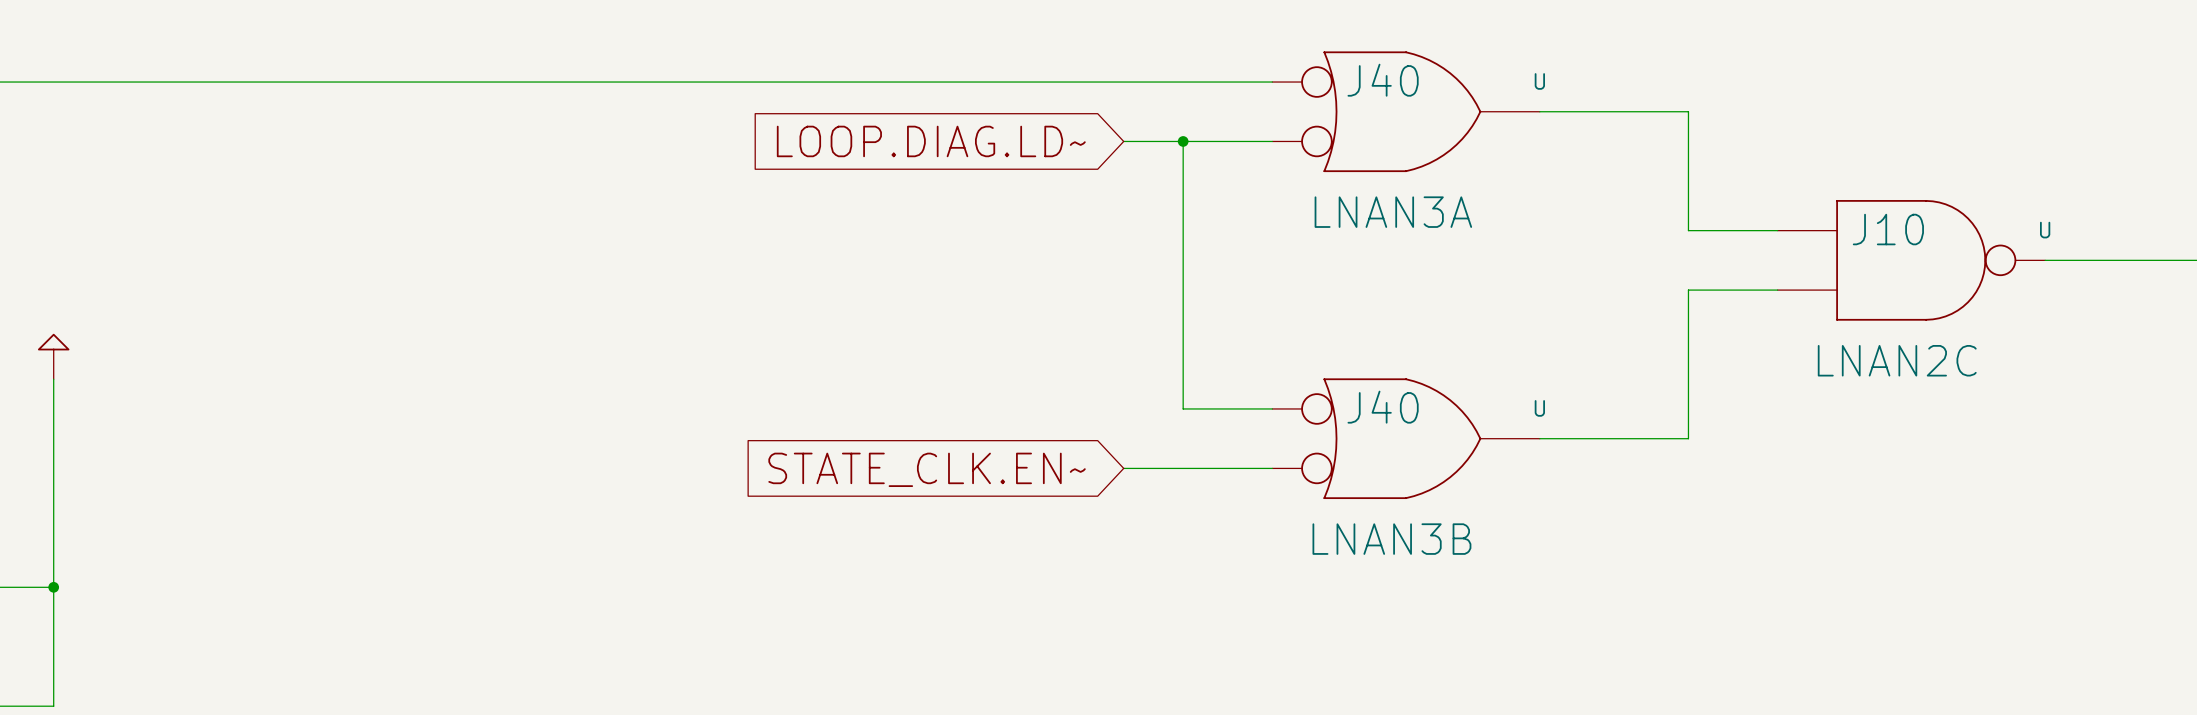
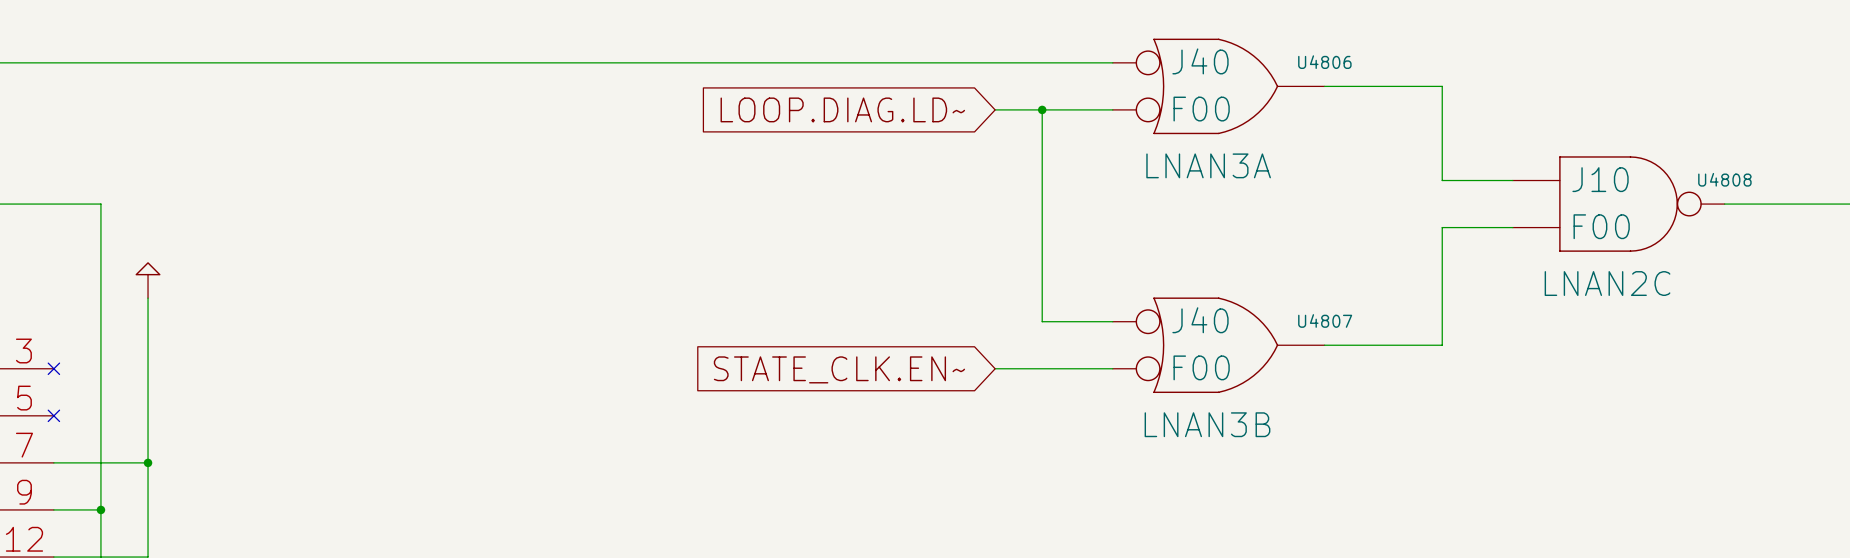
U name: U (1539, 81) -> U4806 (1324, 62)
U value: none -> F00 (1201, 109)
U name: U (2045, 230) -> U4808 (1724, 179)
U value: none -> F00 (1601, 226)
U name: U (1539, 408) -> U4807 (1325, 320)
U value: none -> F00 (1201, 367)

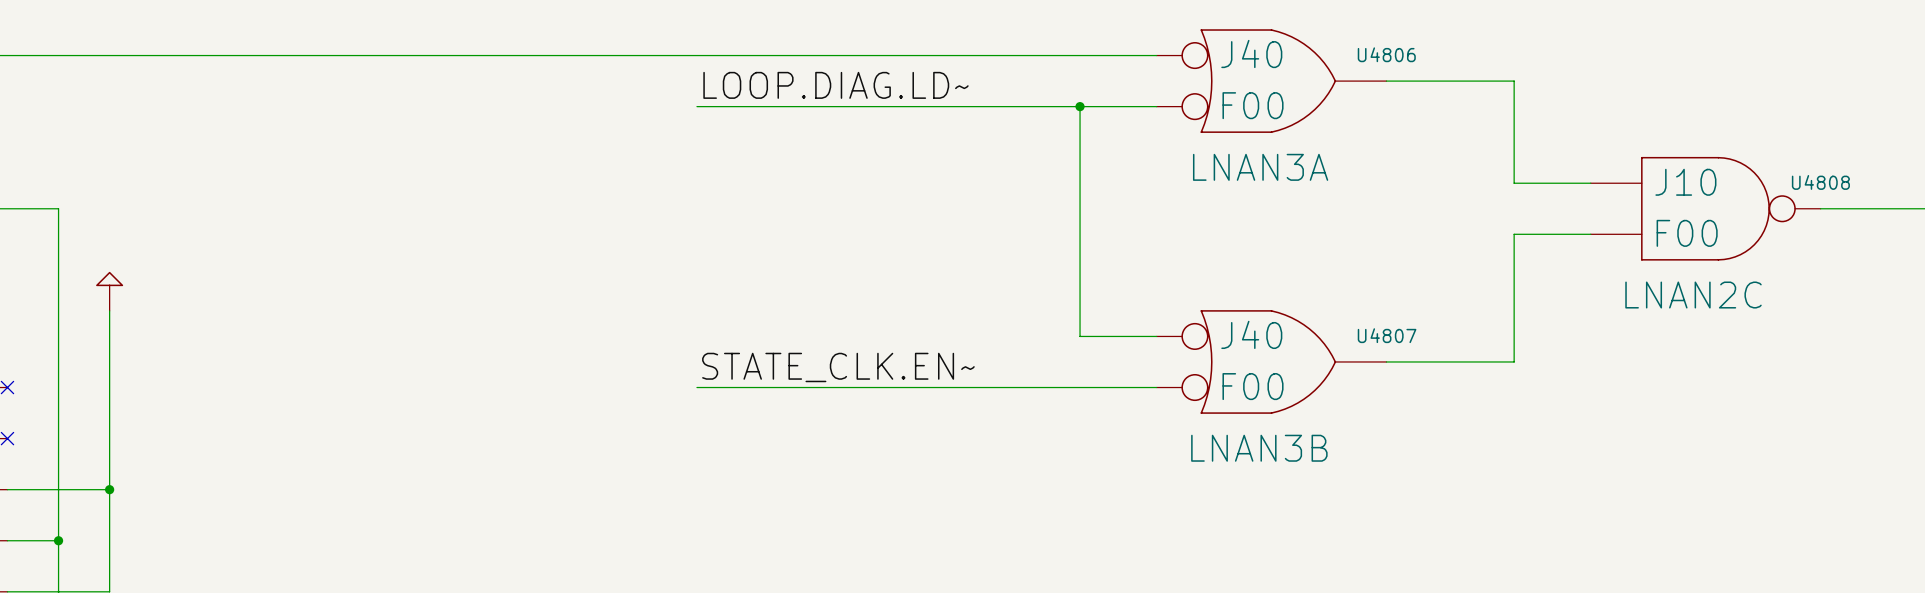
label: none -> LOOP.DIAG.LD~ (836, 85)
wire: none -> (696, 106) (1028, 106)
global label: LOOP.DIAG.LD~ (842, 109) -> none
label: none -> STATE_CLK.EN~ (838, 367)
wire: none -> (696, 387) (1028, 387)
global label: STATE_CLK.EN~ (839, 369) -> none

